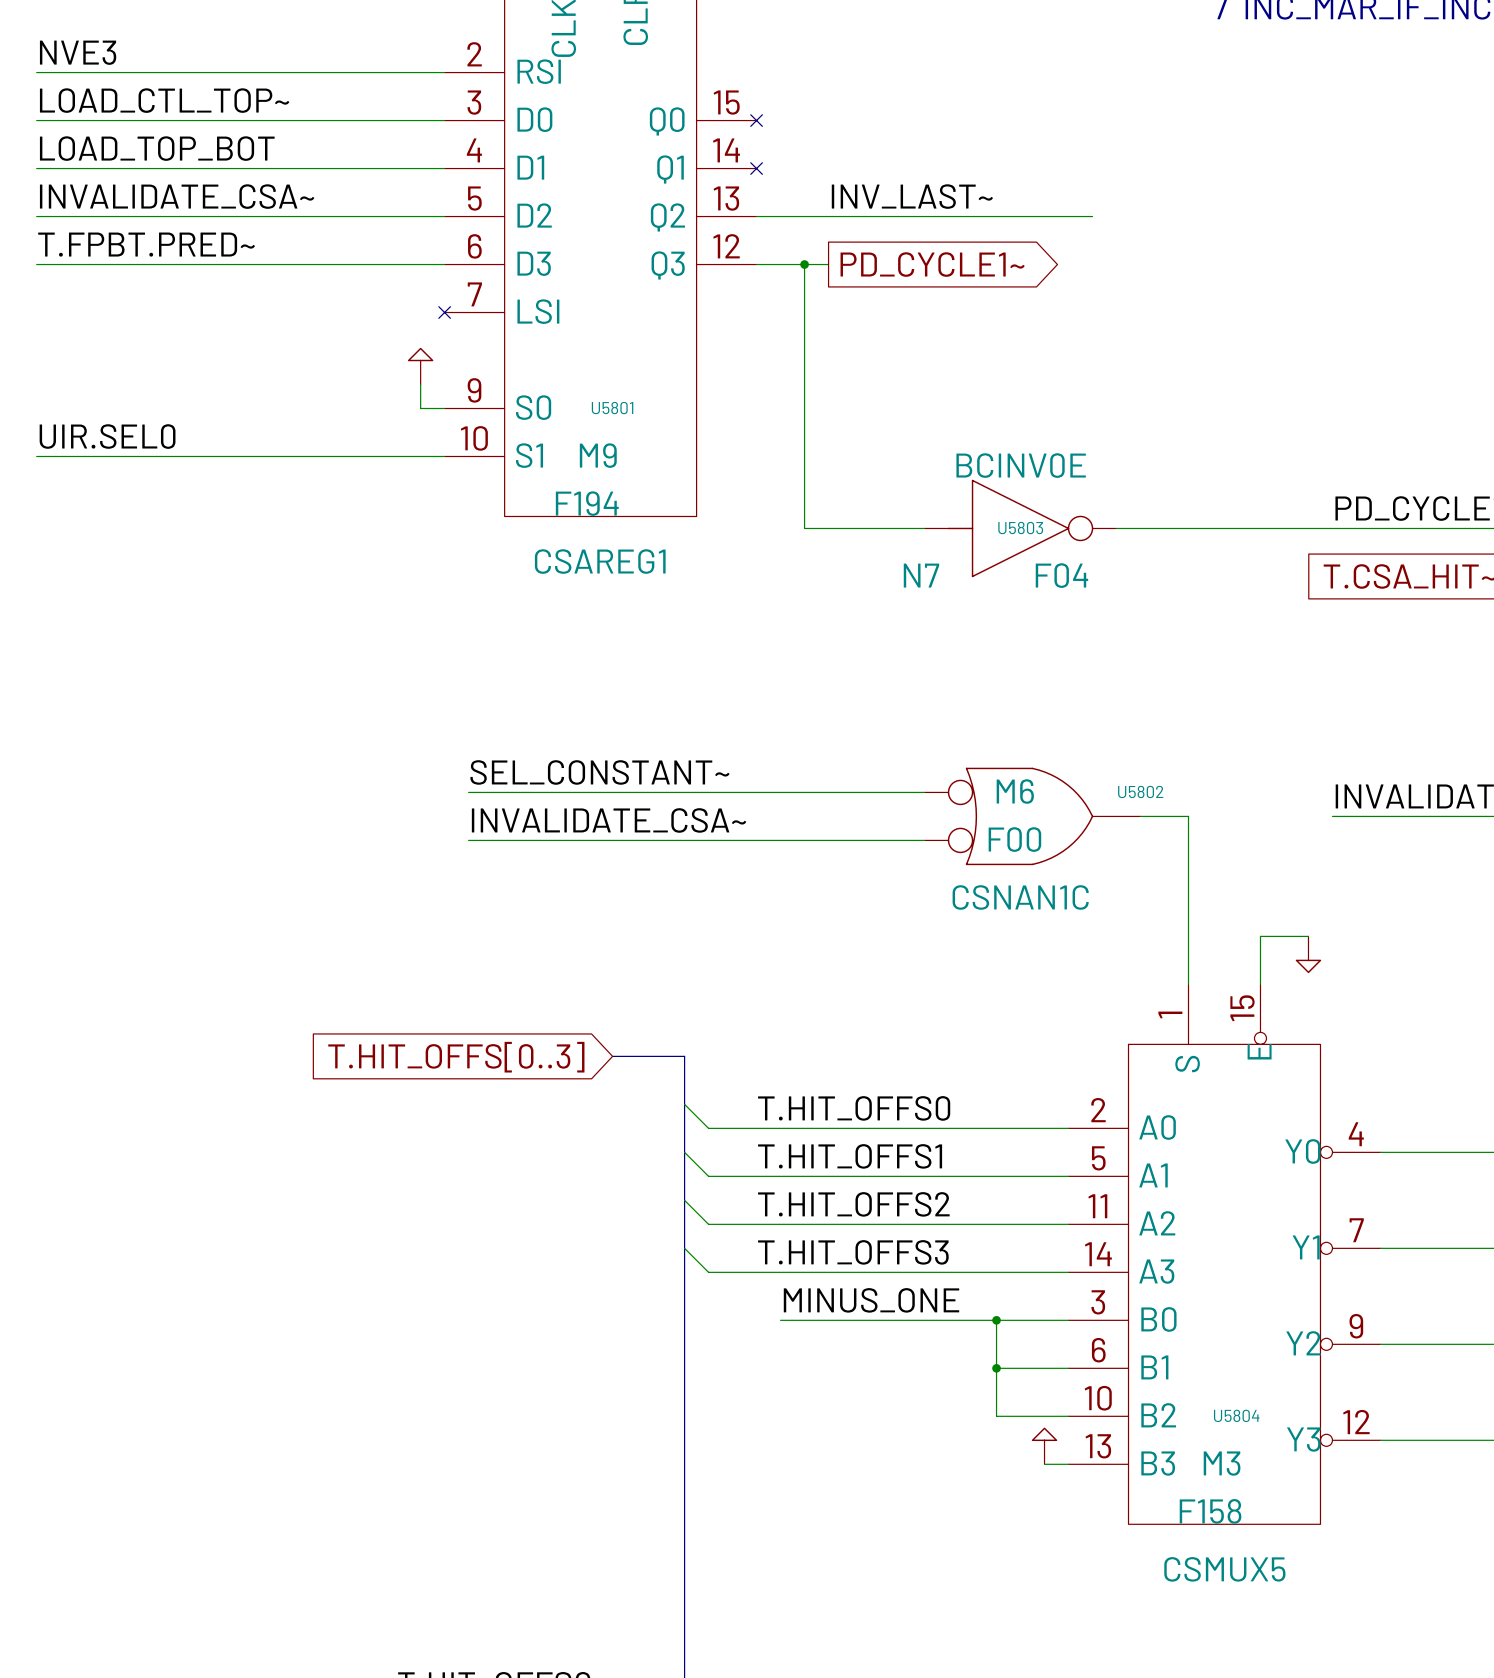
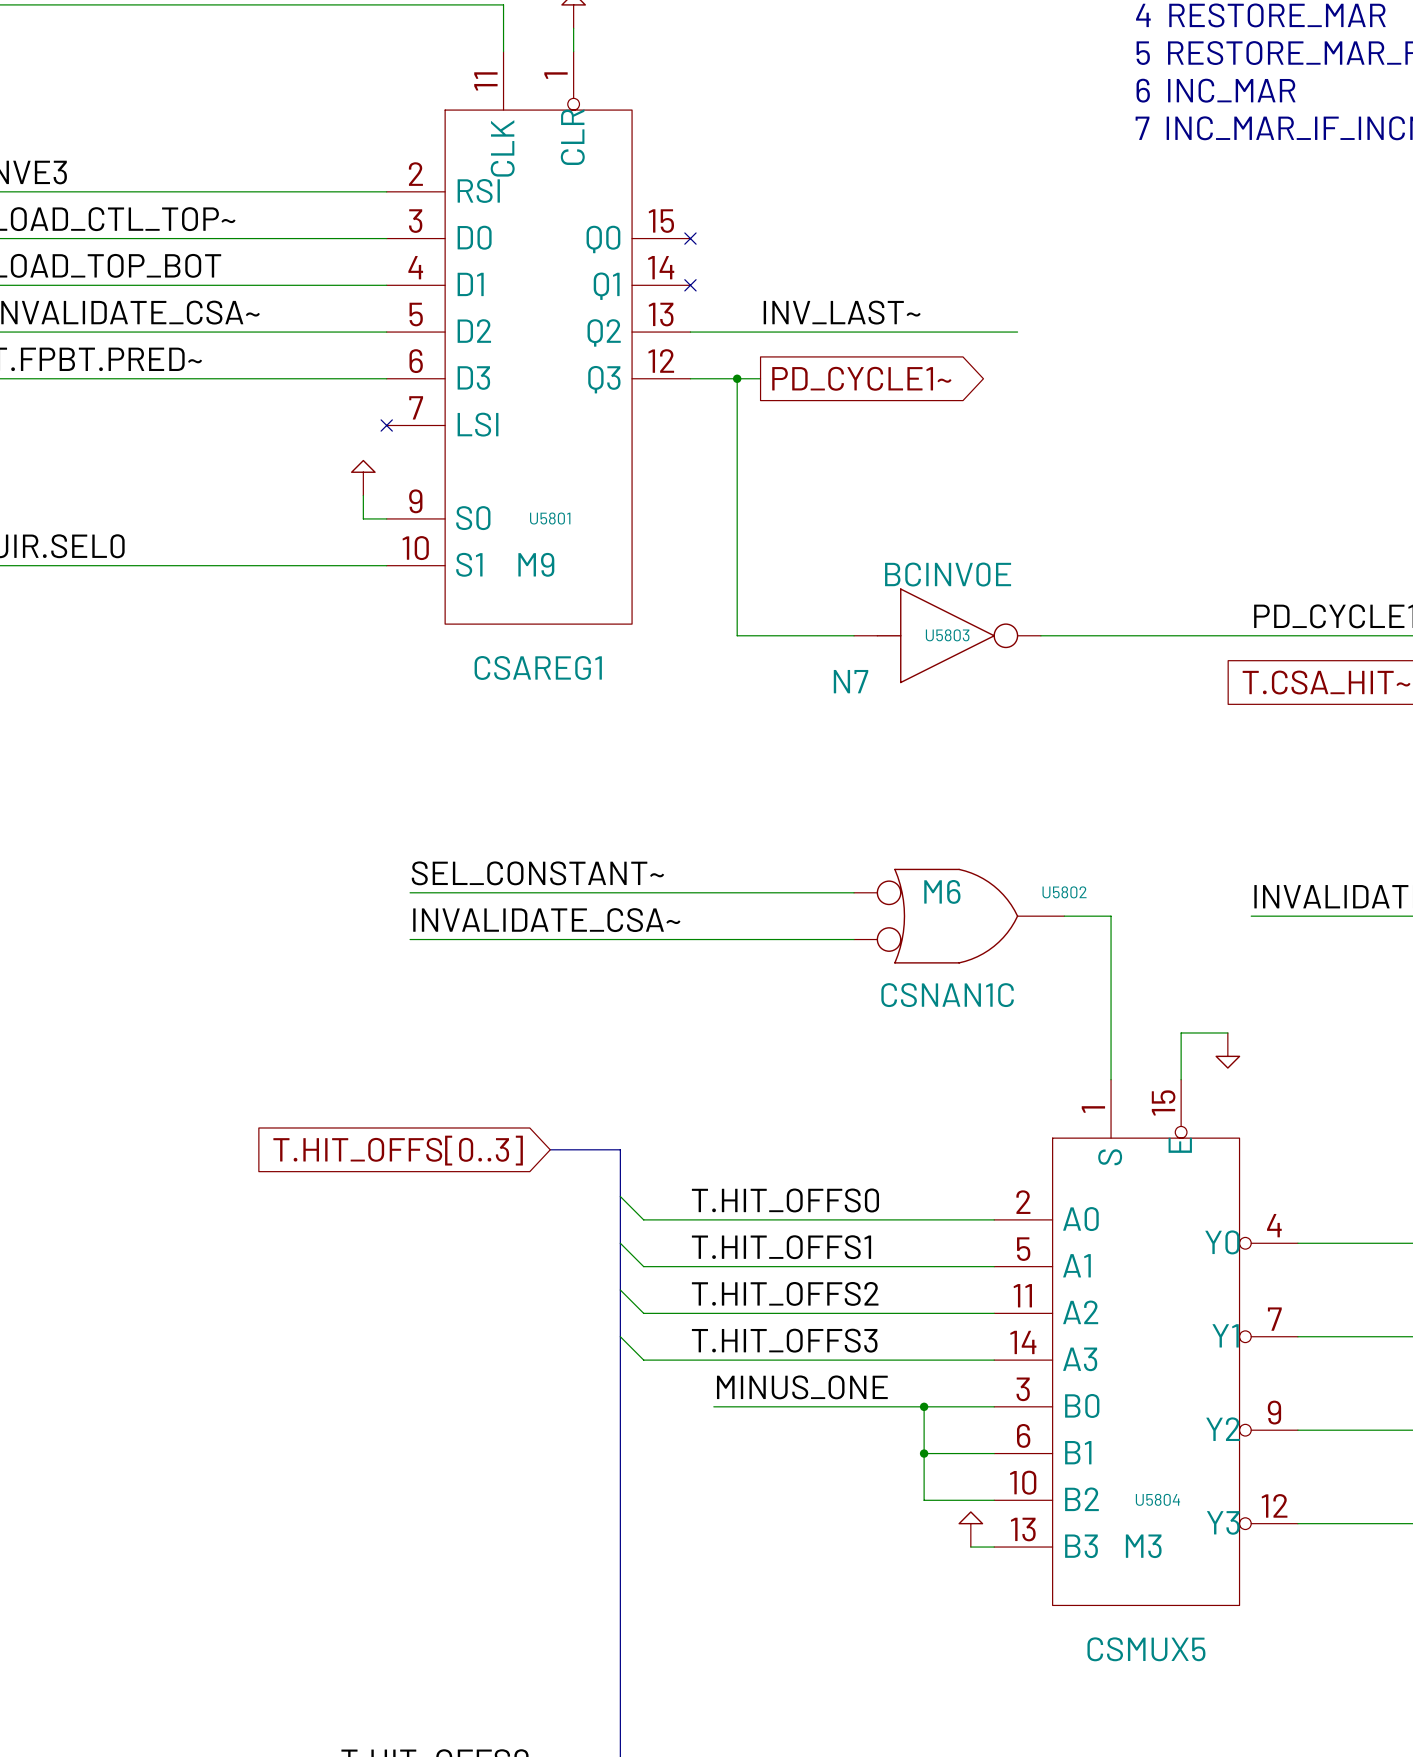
U5801 value: F194 (587, 503) -> none
U5803 value: F04 (1061, 575) -> none
U5802 value: F00 (1014, 839) -> none
U5804 value: F158 (1210, 1511) -> none

